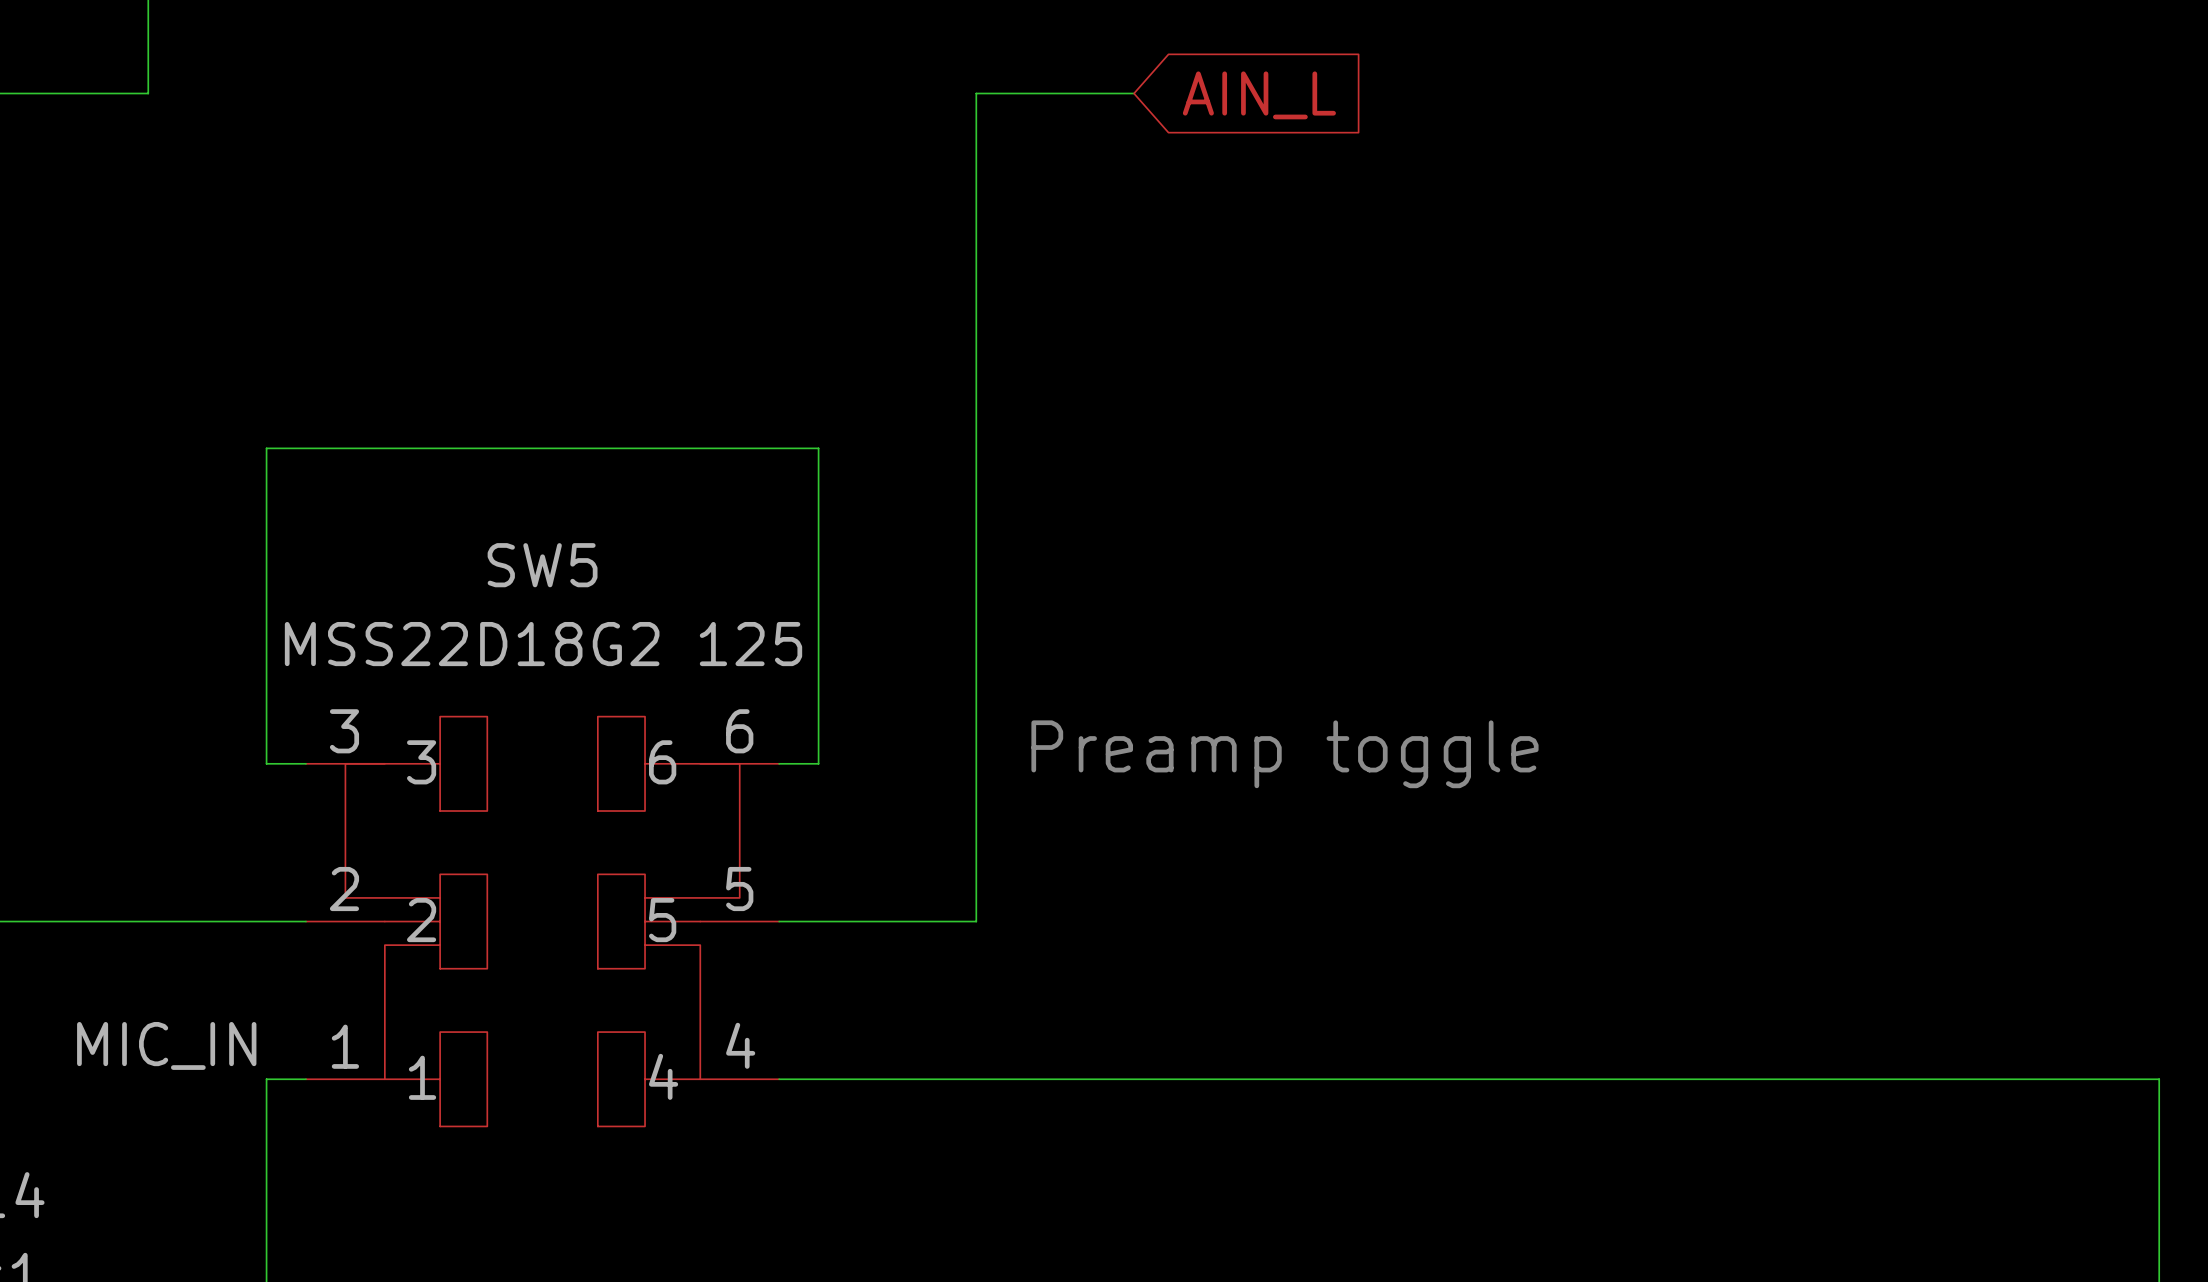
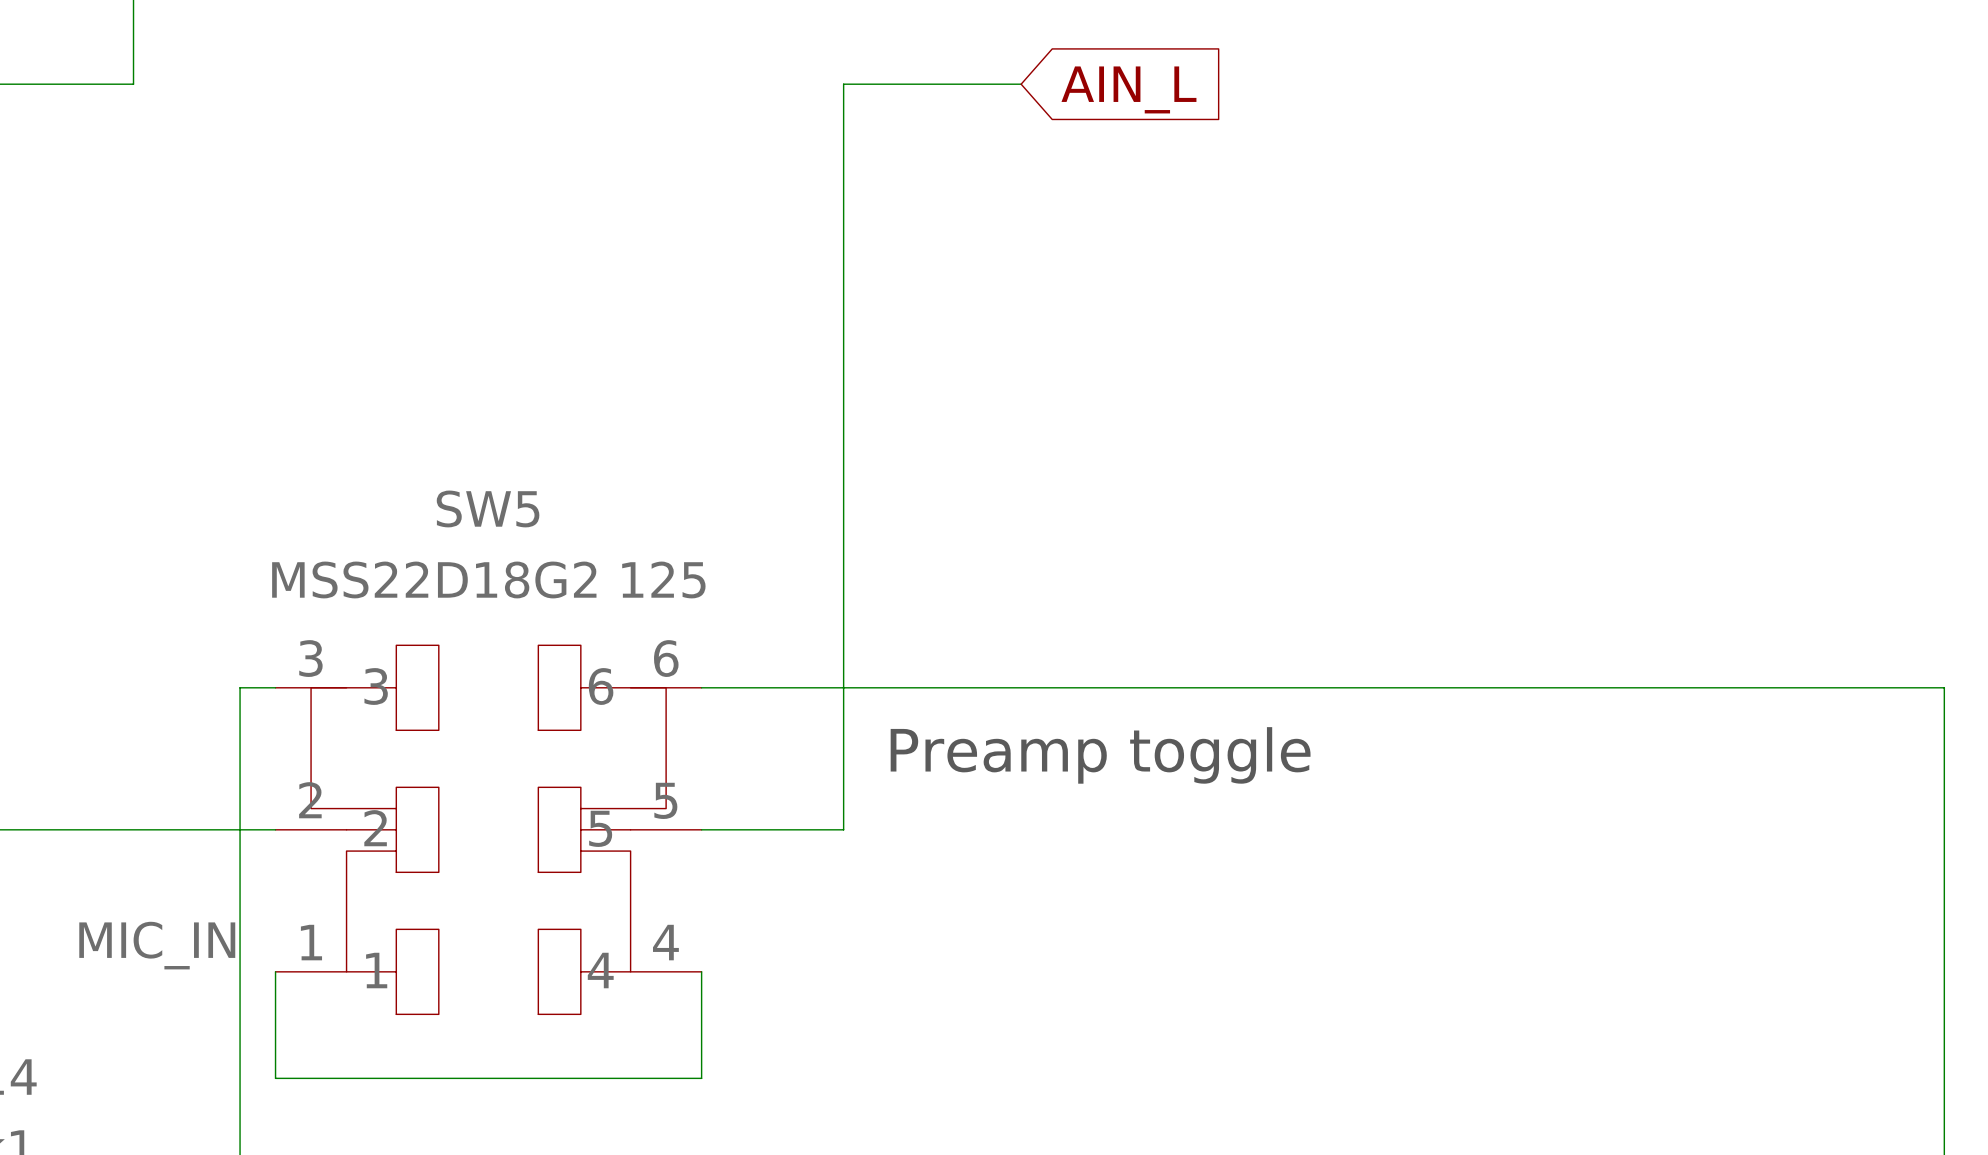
wire: (976, 93) (976, 921) (936, 921) -> (879, 84) (843, 84) (843, 829)
text position: Preamp toggle (1284, 754) -> Preamp toggle (1100, 755)
wire: (266, 763) (266, 448) (818, 448) (818, 763) -> none
wire: (266, 1079) (305, 1079) -> (240, 971) (240, 687)
wire: none -> (275, 971) (275, 1078) (701, 1078) (701, 971)
wire: (779, 1079) (2159, 1079) -> (737, 687) (1944, 687) (1944, 971)

